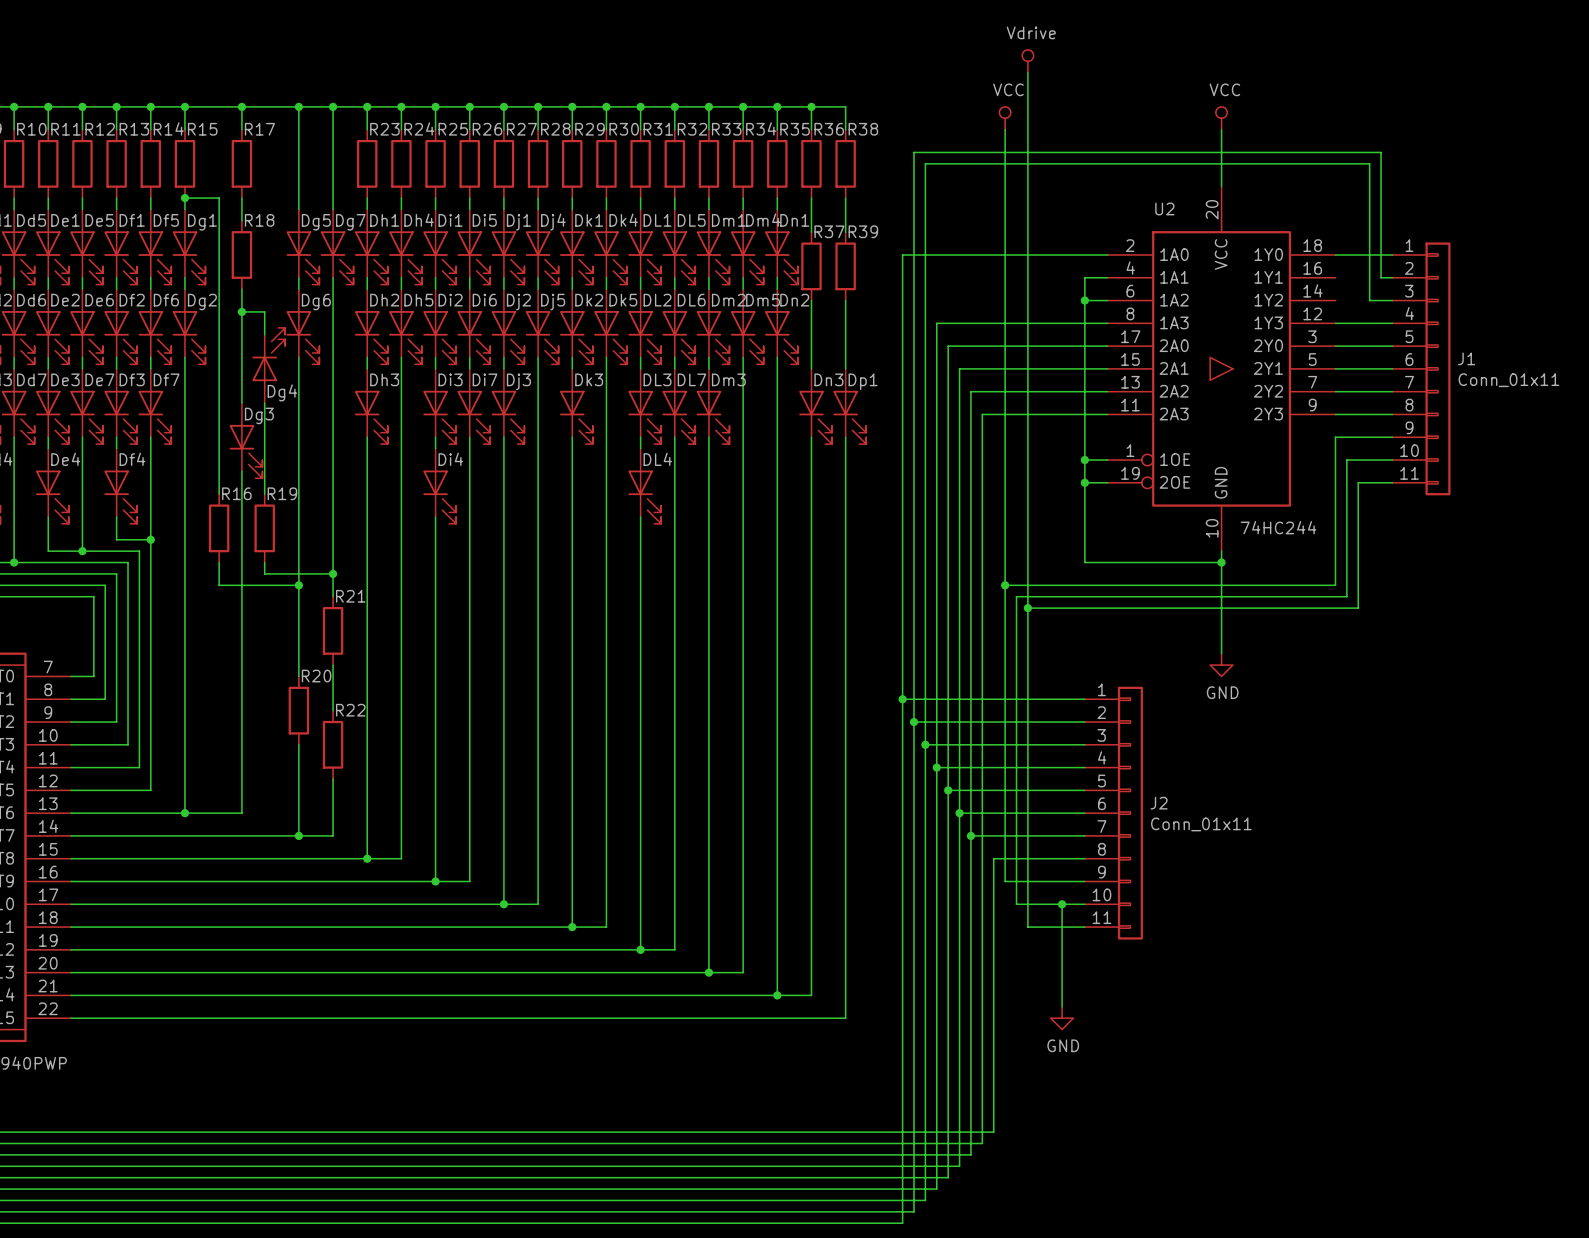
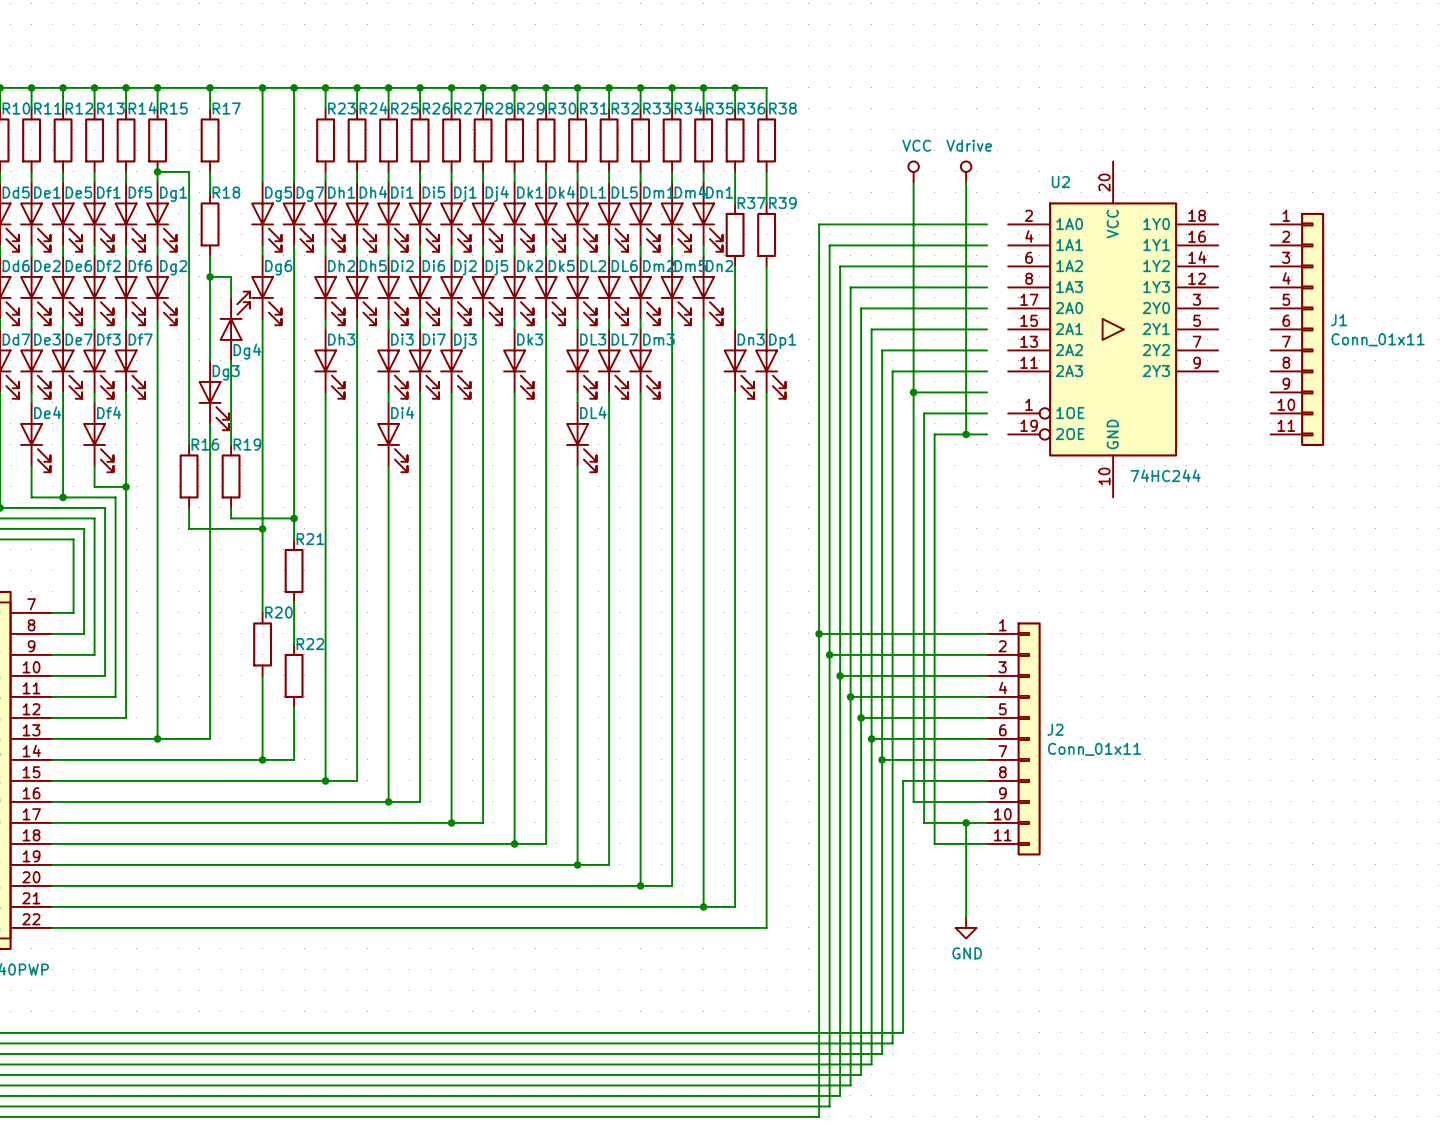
power symbol position: Vdrive (1027, 61) -> Vdrive (966, 171)
wire: (1027, 72) (1027, 482) -> none
power symbol position: VCC (1005, 118) -> VCC (913, 171)
power symbol: VCC (1221, 118) -> none
wire: (1005, 129) (1005, 209) -> none
wire: (1221, 129) (1221, 186) -> none
wire: none -> (966, 182) (966, 434)
wire: (1084, 254) (1107, 254) -> none
wire: (1335, 254) (1392, 254) -> none
wire: (914, 277) (914, 152) (1381, 152) (1381, 277) (1392, 277) -> (829, 245) (987, 245)
wire: (1107, 277) (1084, 277) (1084, 562) (1221, 562) -> none
wire: (925, 300) (925, 163) (1369, 163) (1369, 300) (1392, 300) -> none
wire: (1084, 300) (1107, 300) -> (987, 266) (840, 266)
junction: (1084, 300) -> none
wire: (1084, 323) (1107, 323) -> none
wire: (1335, 323) (1392, 323) -> none
wire: (1084, 346) (1107, 346) -> none
wire: (1335, 346) (1392, 346) -> none
wire: (1084, 368) (1107, 368) -> none
wire: (1335, 368) (1392, 368) -> none
wire: (1084, 391) (1107, 391) -> none
wire: (1335, 391) (1392, 391) -> none
wire: (1084, 414) (1107, 414) -> none
wire: (1335, 414) (1392, 414) -> none
wire: none -> (913, 392) (987, 392)
junction: none -> (913, 392)
wire: (1392, 437) (1335, 437) (1335, 585) (1005, 585) -> none
wire: (1084, 460) (1107, 460) -> (987, 413) (924, 413) (924, 539)
junction: (1084, 460) -> none
wire: (1392, 460) (1346, 460) (1346, 596) (1016, 596) -> none
junction: none -> (966, 434)
wire: (1084, 482) (1107, 482) -> (987, 434) (934, 434)
junction: (1084, 482) -> none
wire: (1392, 482) (1358, 482) (1358, 608) (1027, 608) -> none
wire: (1221, 551) (1221, 653) -> none
junction: (1221, 562) -> none
junction: (1005, 585) -> none
junction: (1027, 608) -> none
power symbol: GND (1221, 665) -> none

